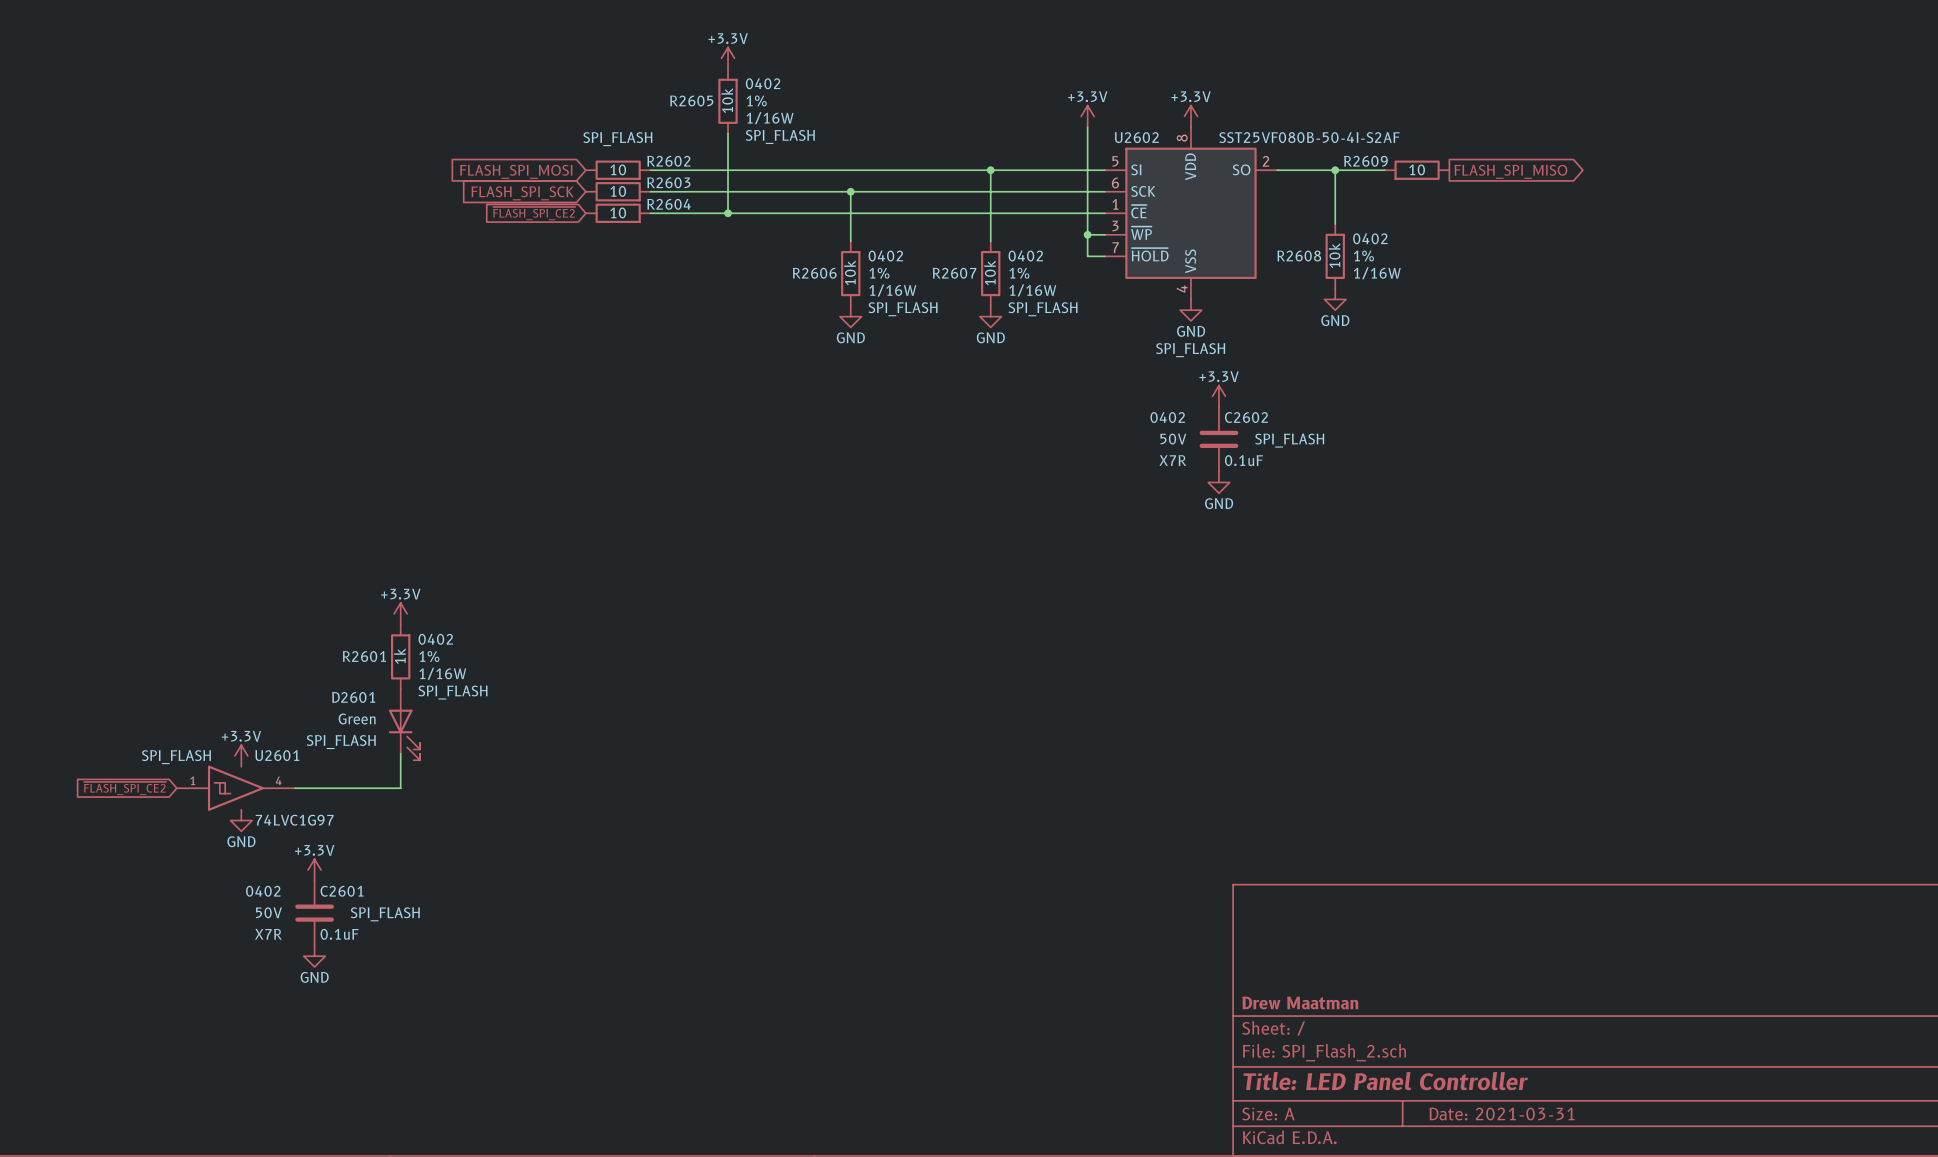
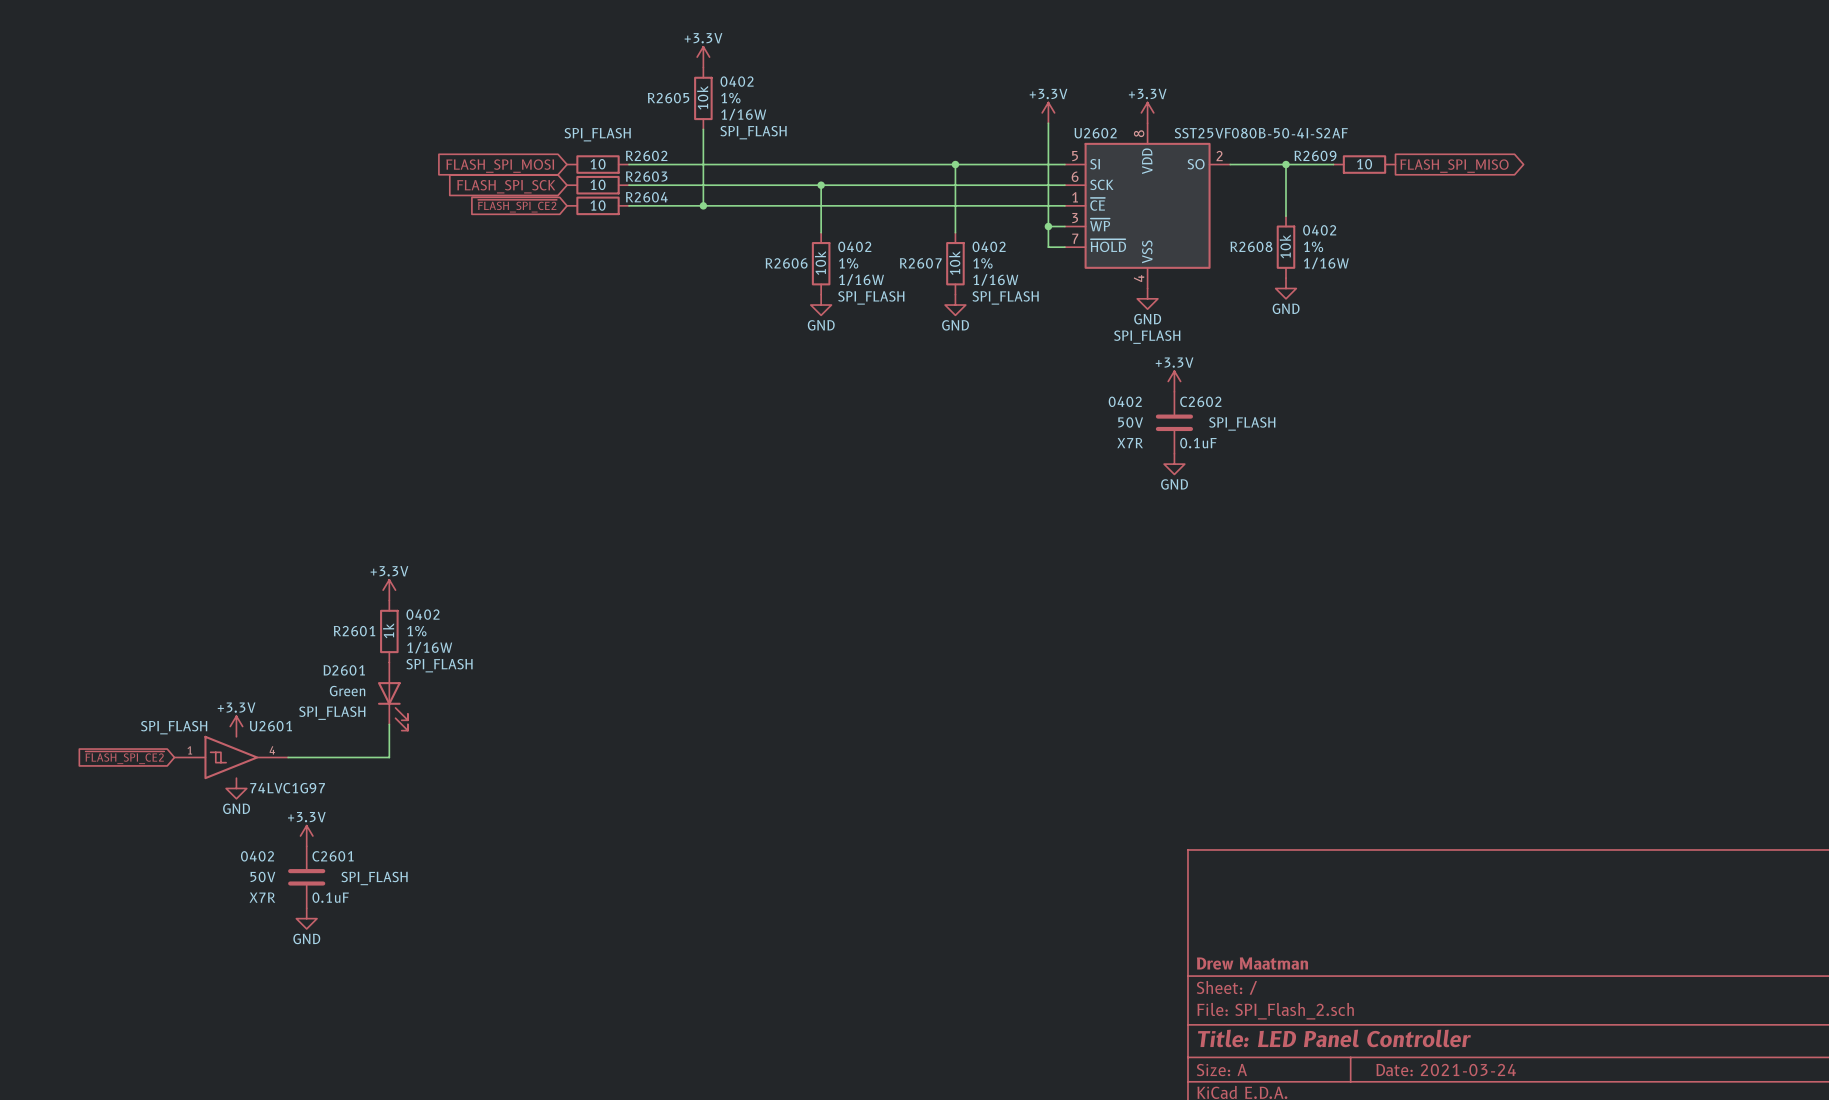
title block: Date: 2021-03-31 (1502, 1113) -> Date: 2021-03-24 (1446, 1070)

